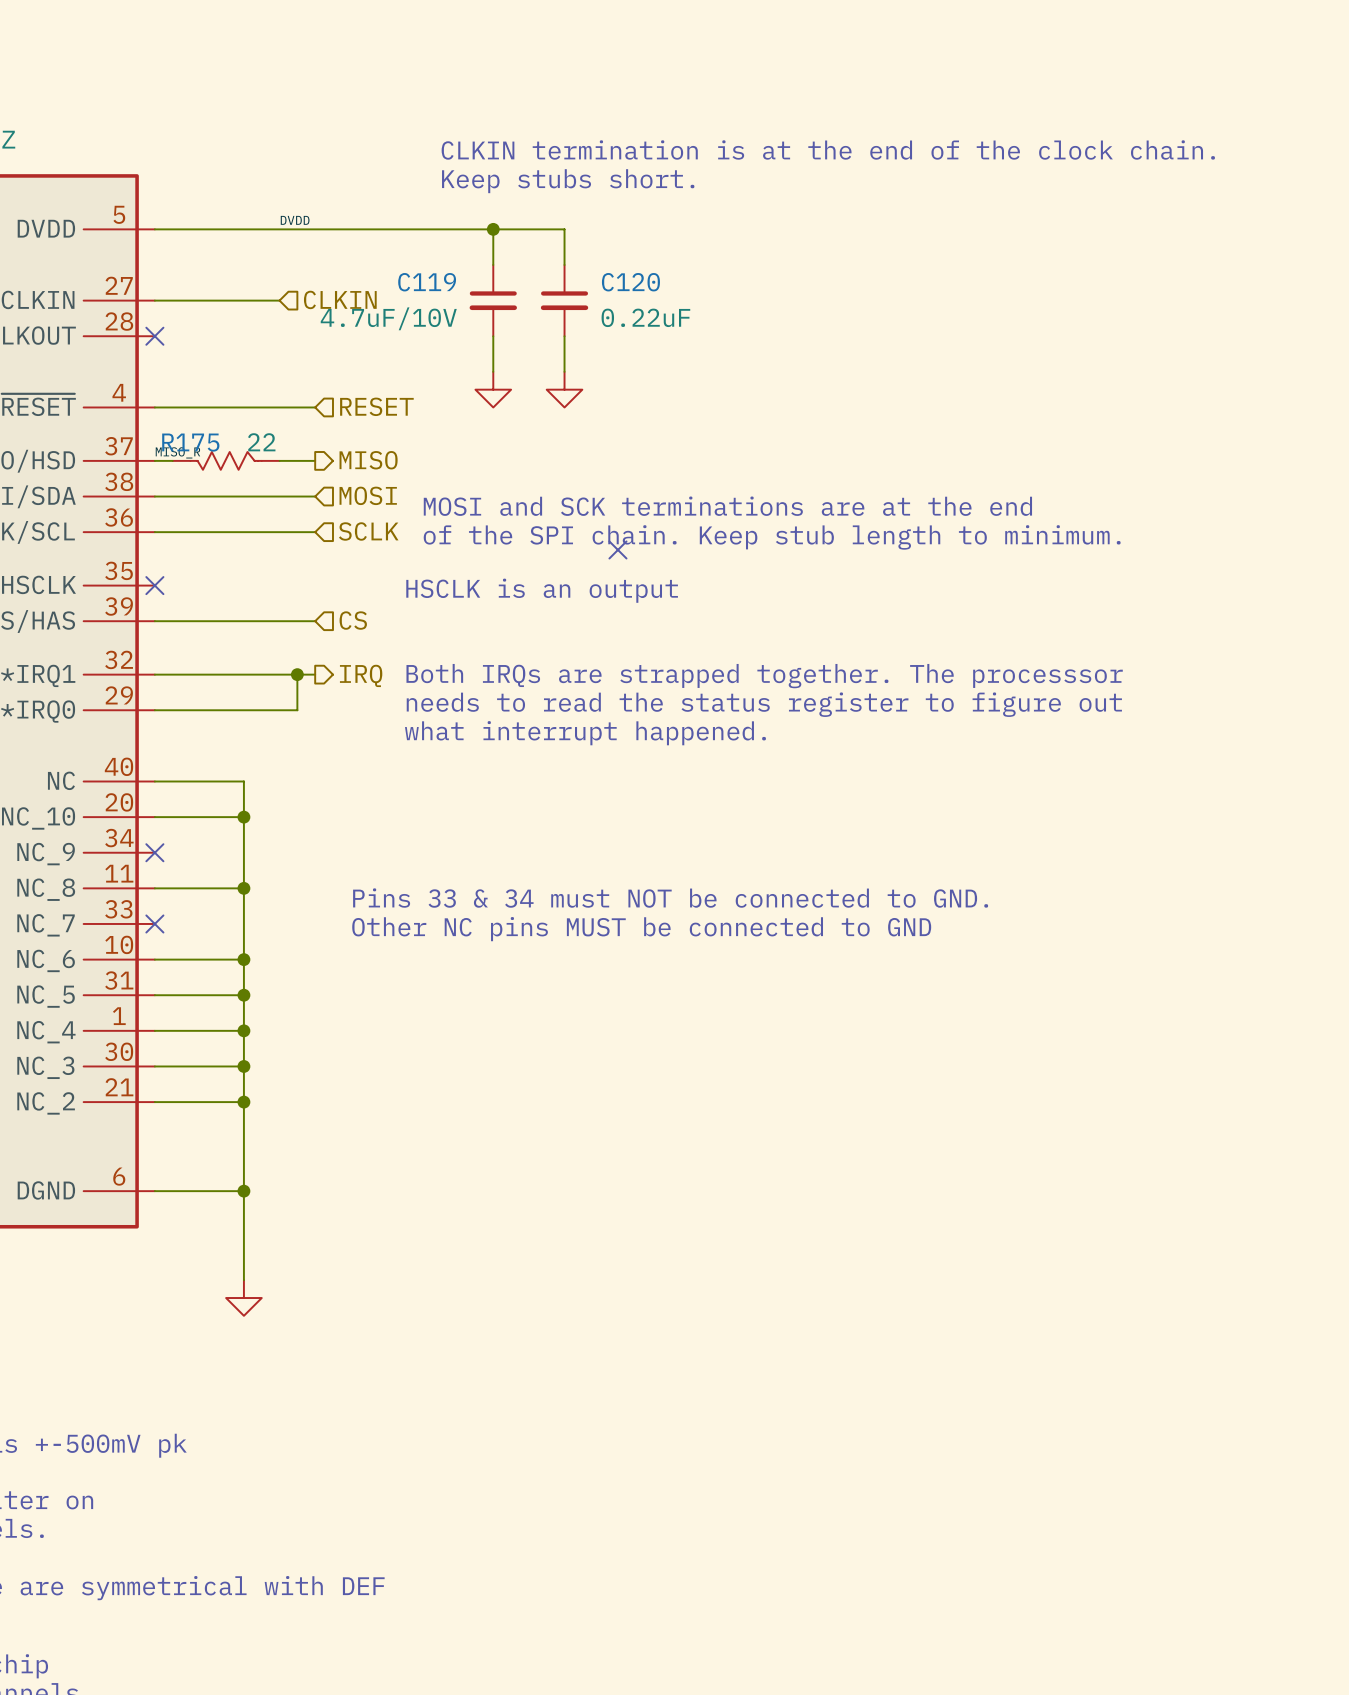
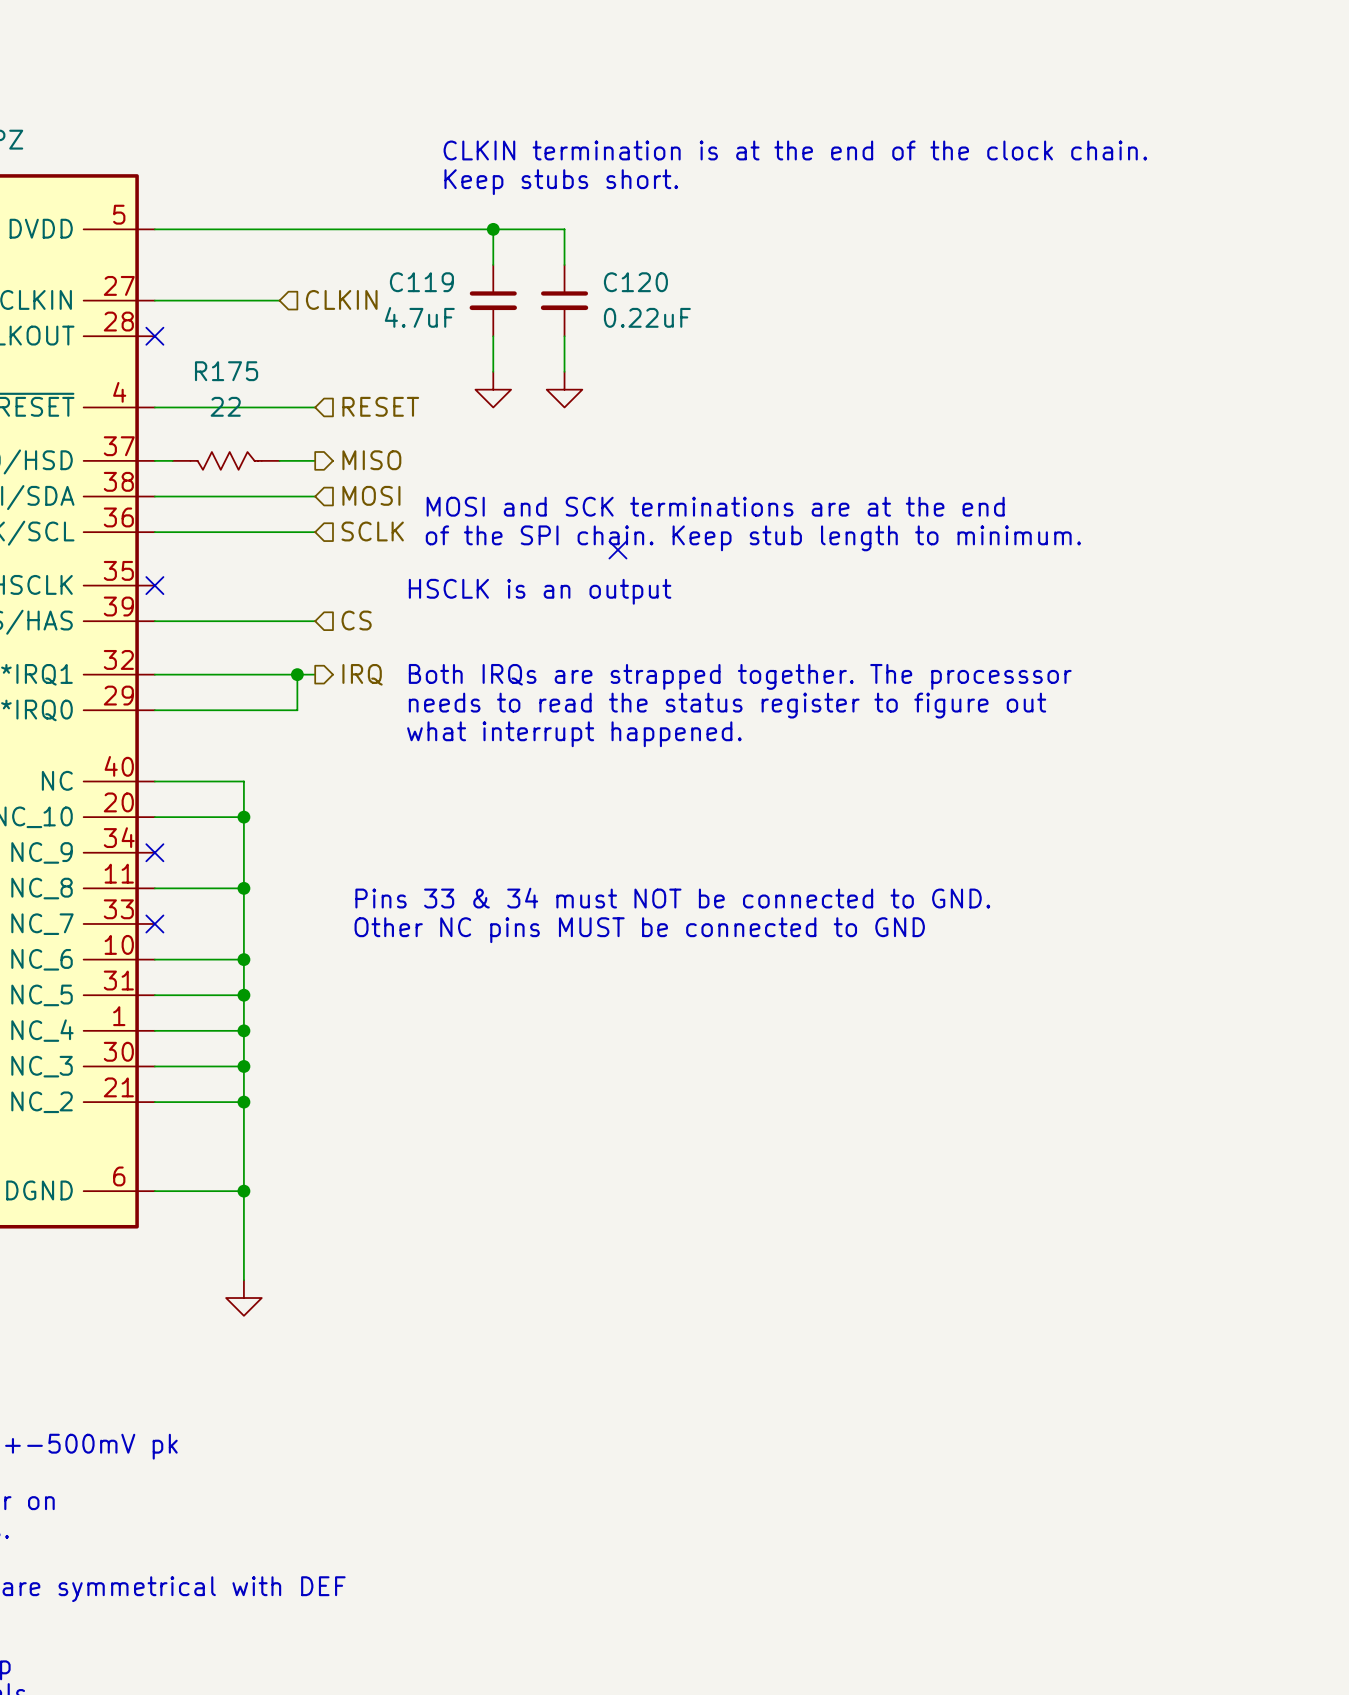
label: DVDD (295, 220) -> none
C119 value: 4.7uF/10V (388, 318) -> 4.7uF (419, 317)
R175 name position: R175 (190, 442) -> R175 (226, 371)
R175 value position: 22 (261, 442) -> 22 (225, 406)
label: MISO_R (177, 452) -> none

